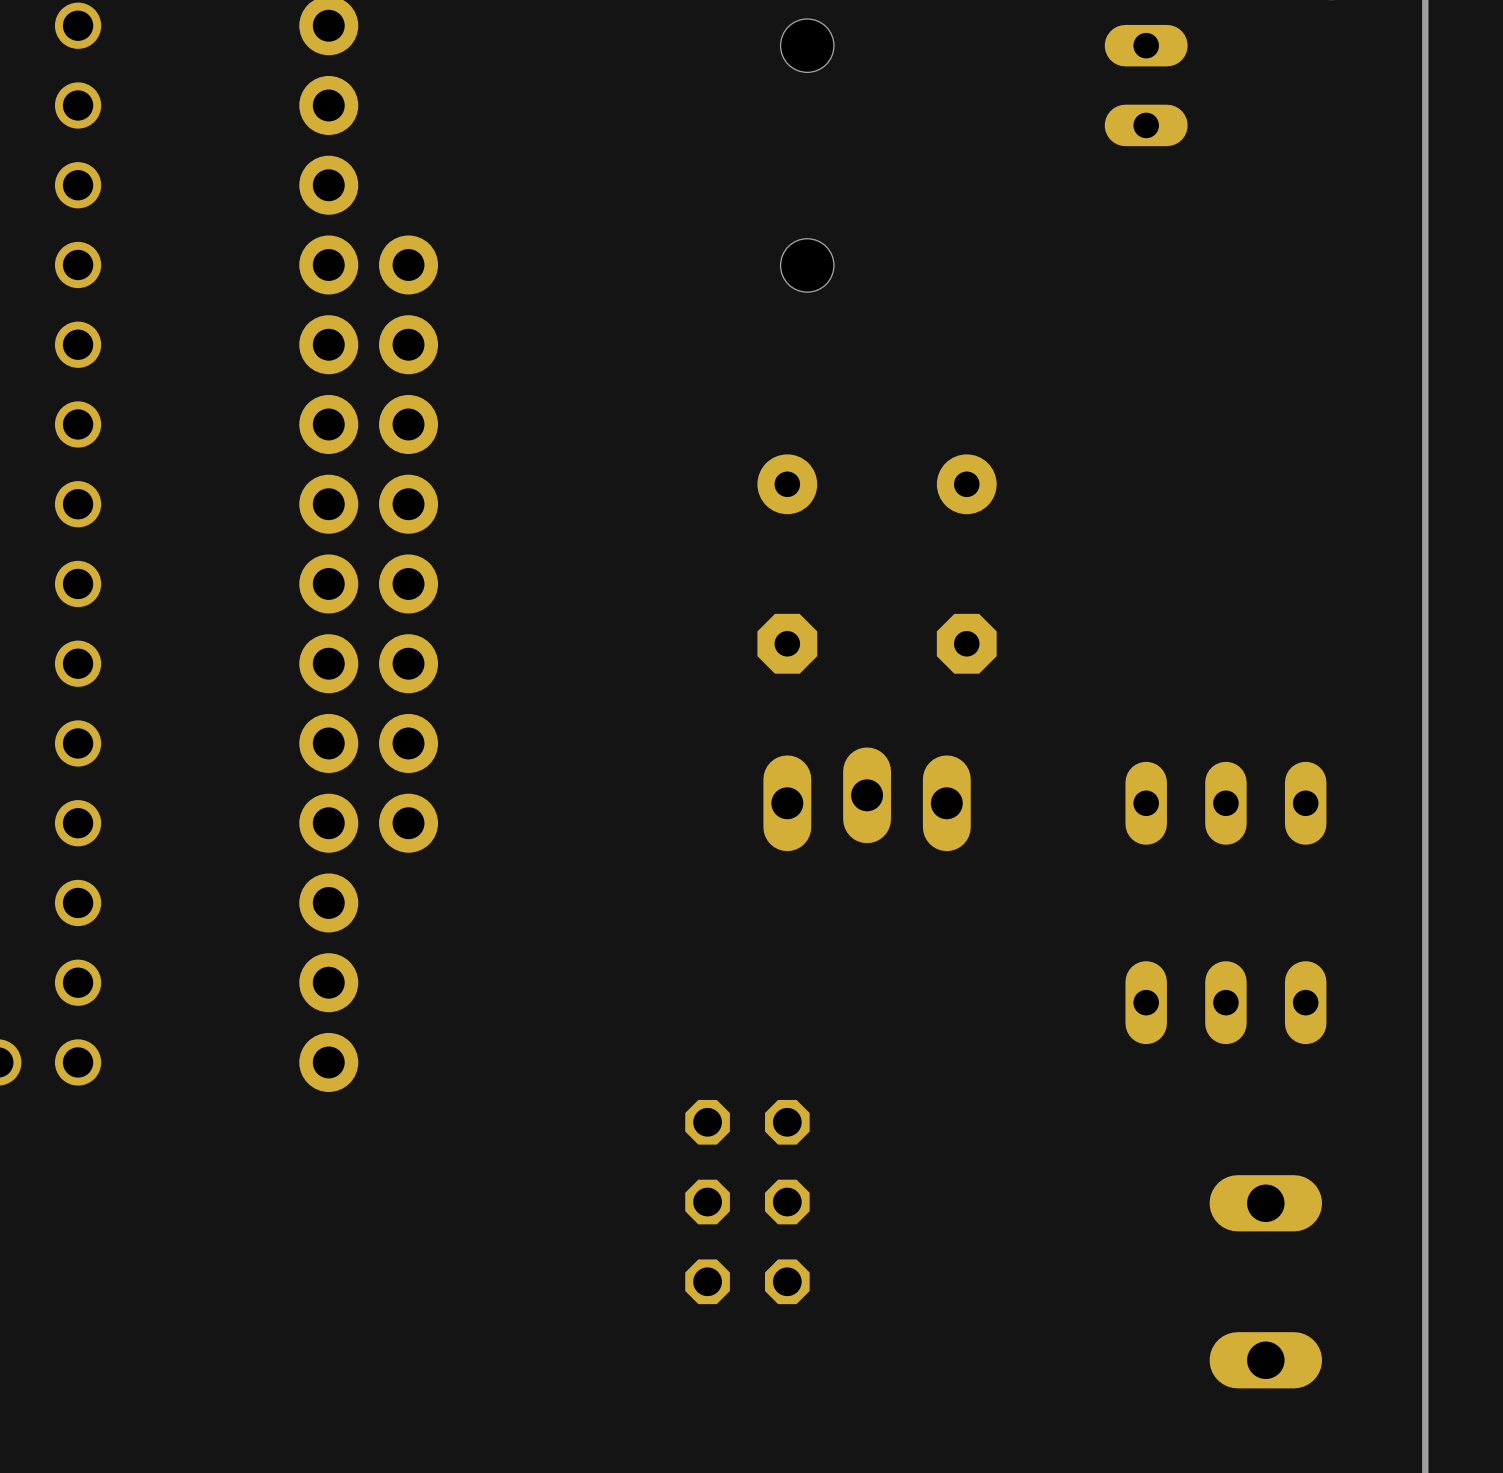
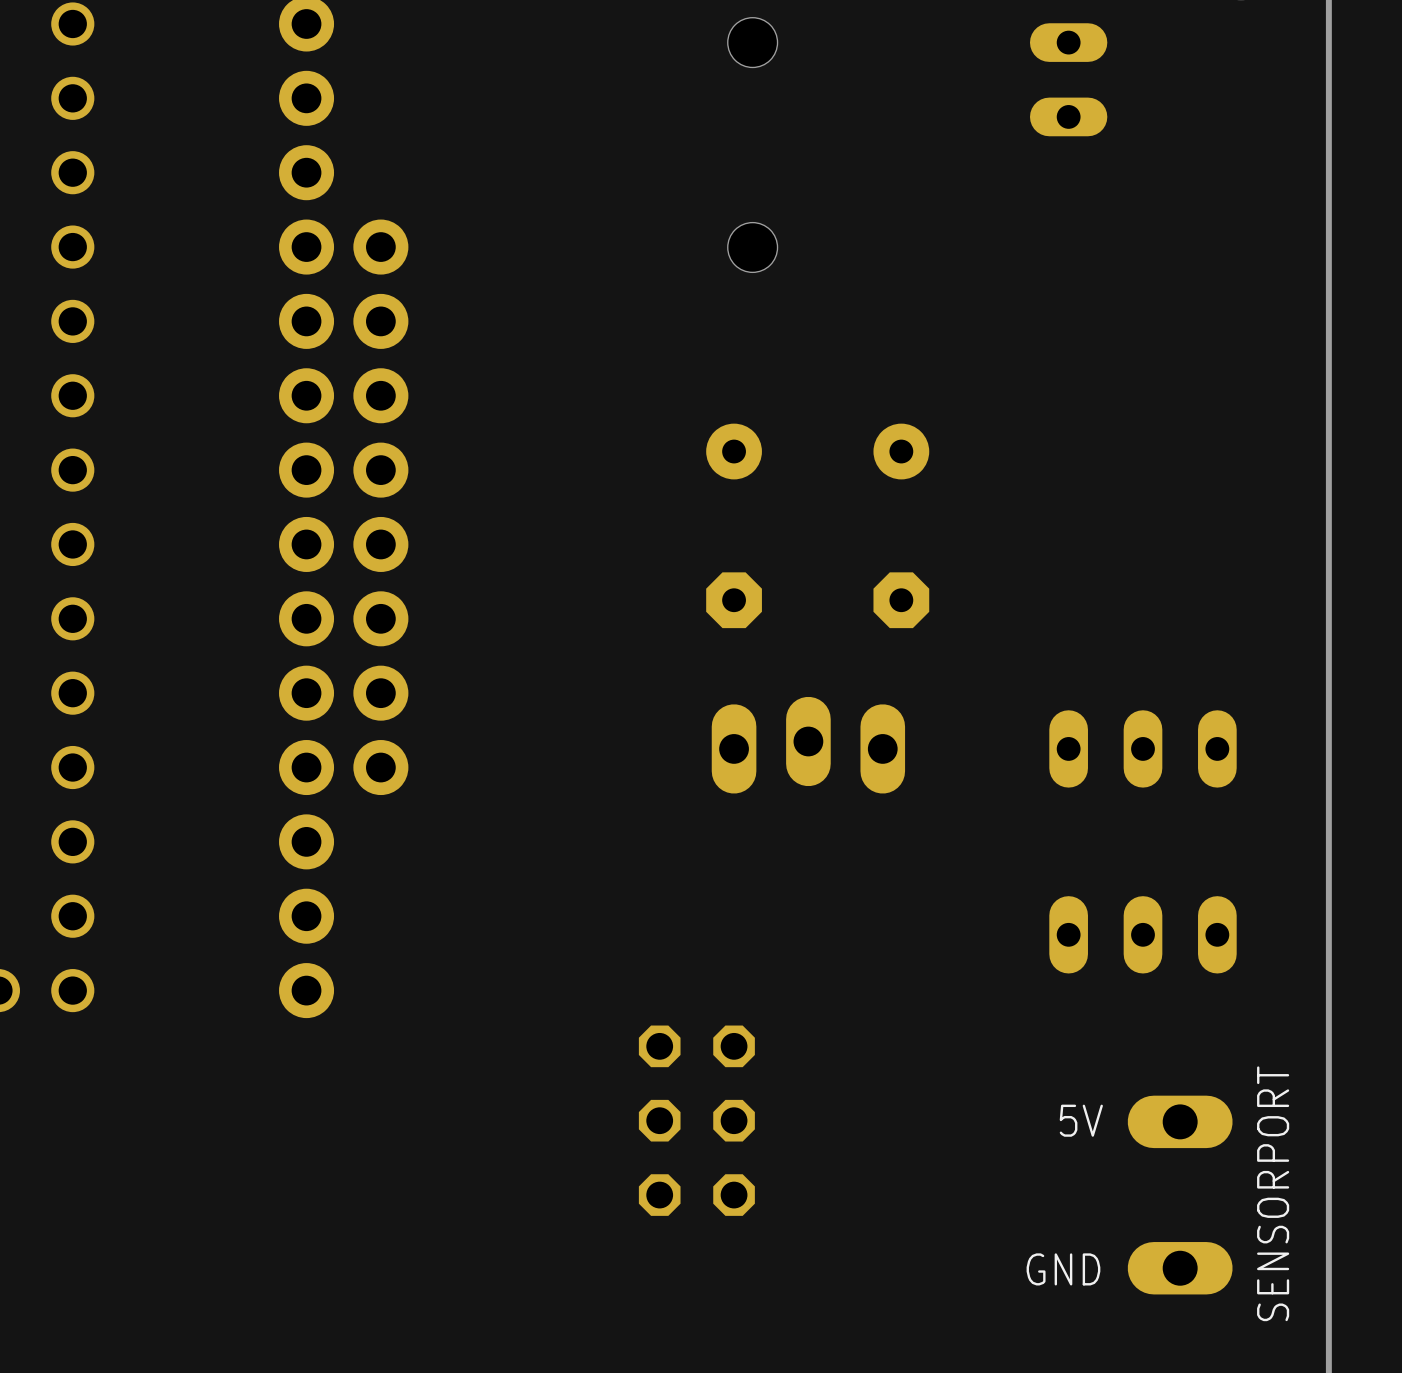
text: none -> 5V (1081, 1120)
text: none -> SENSORPORT (1273, 1193)
text: none -> GND (1063, 1269)

